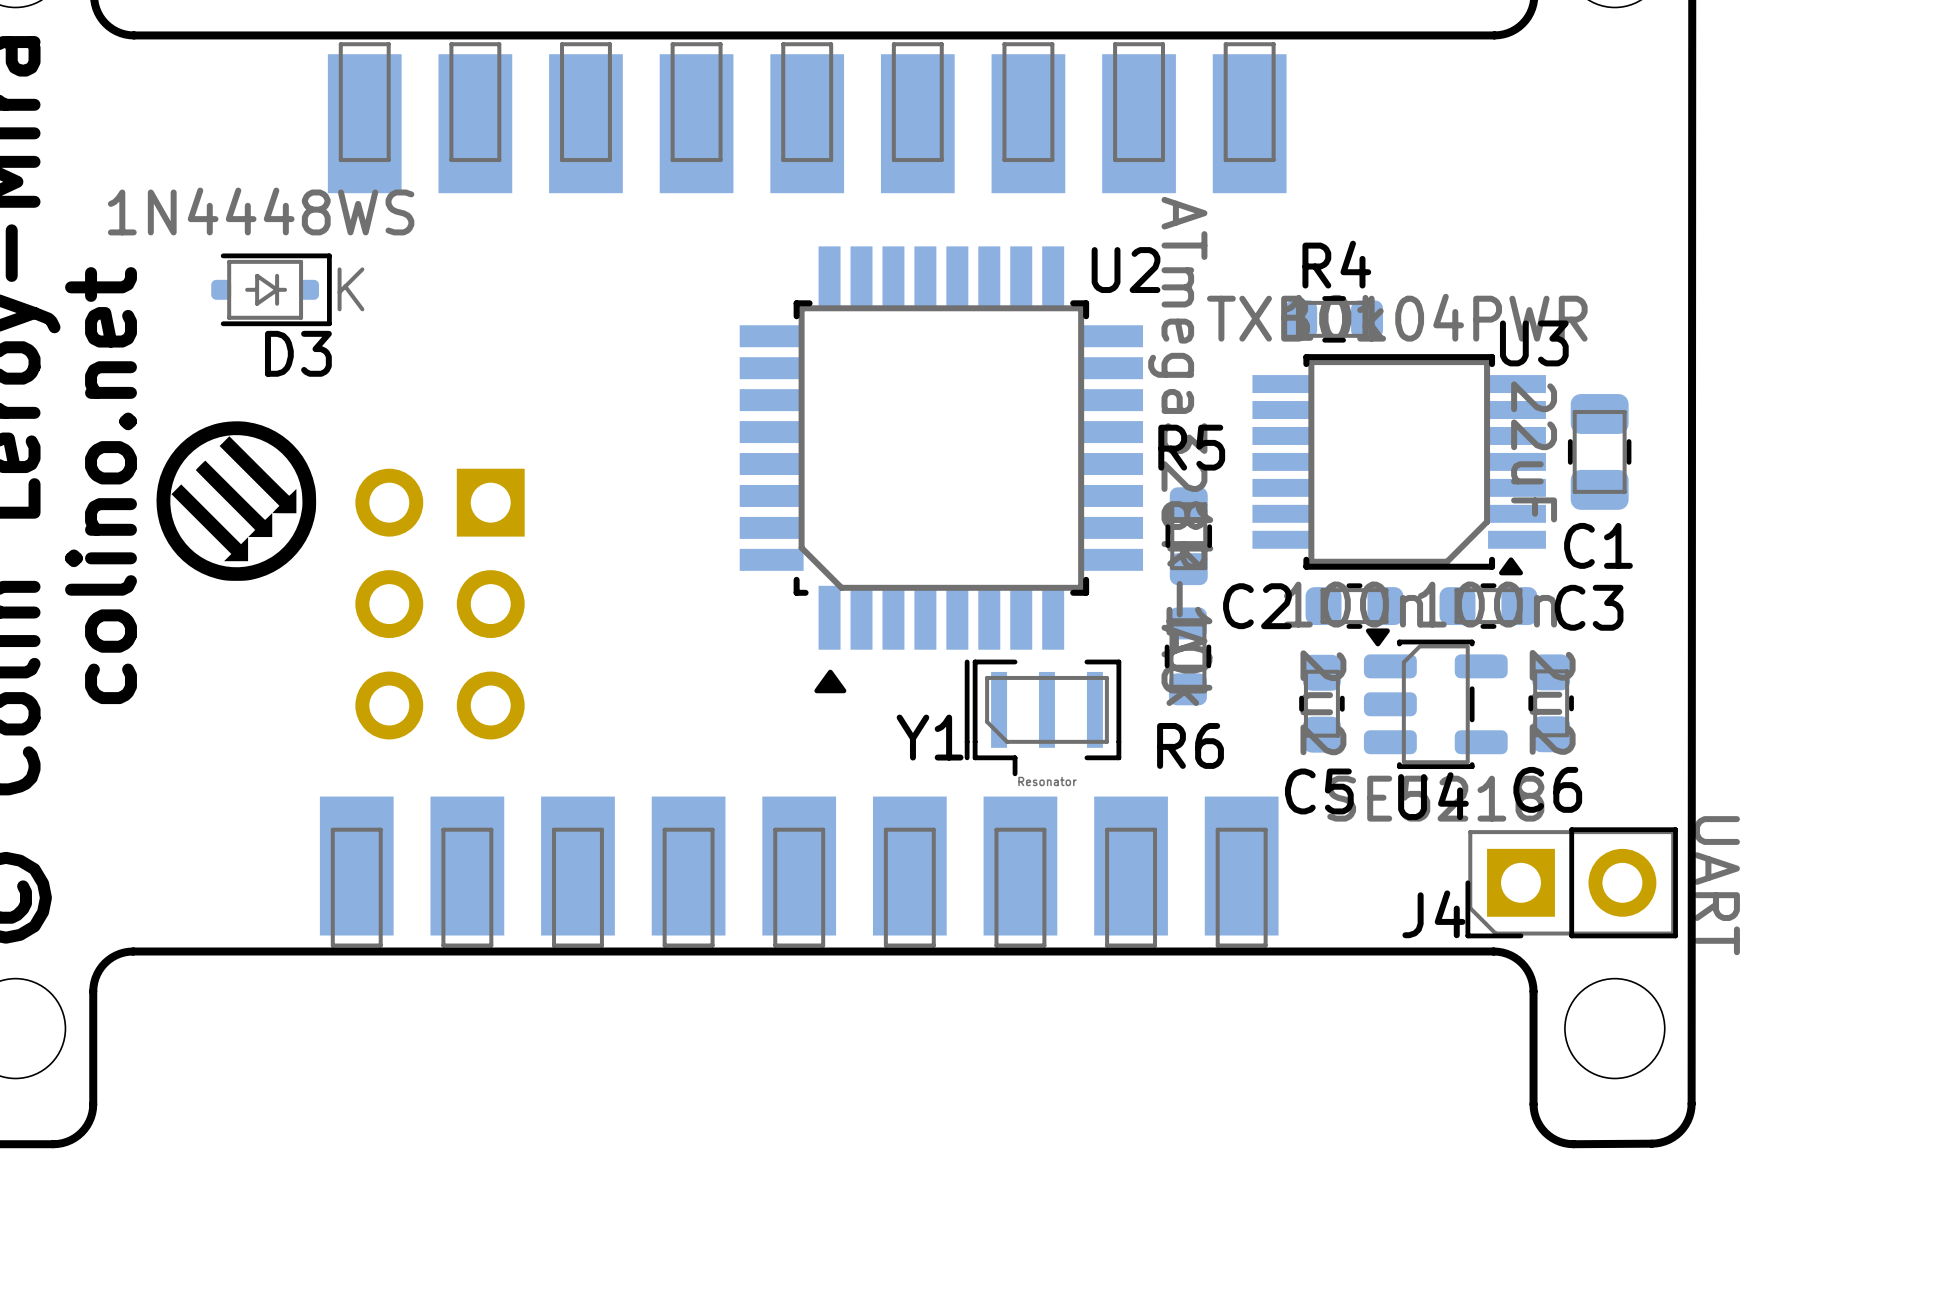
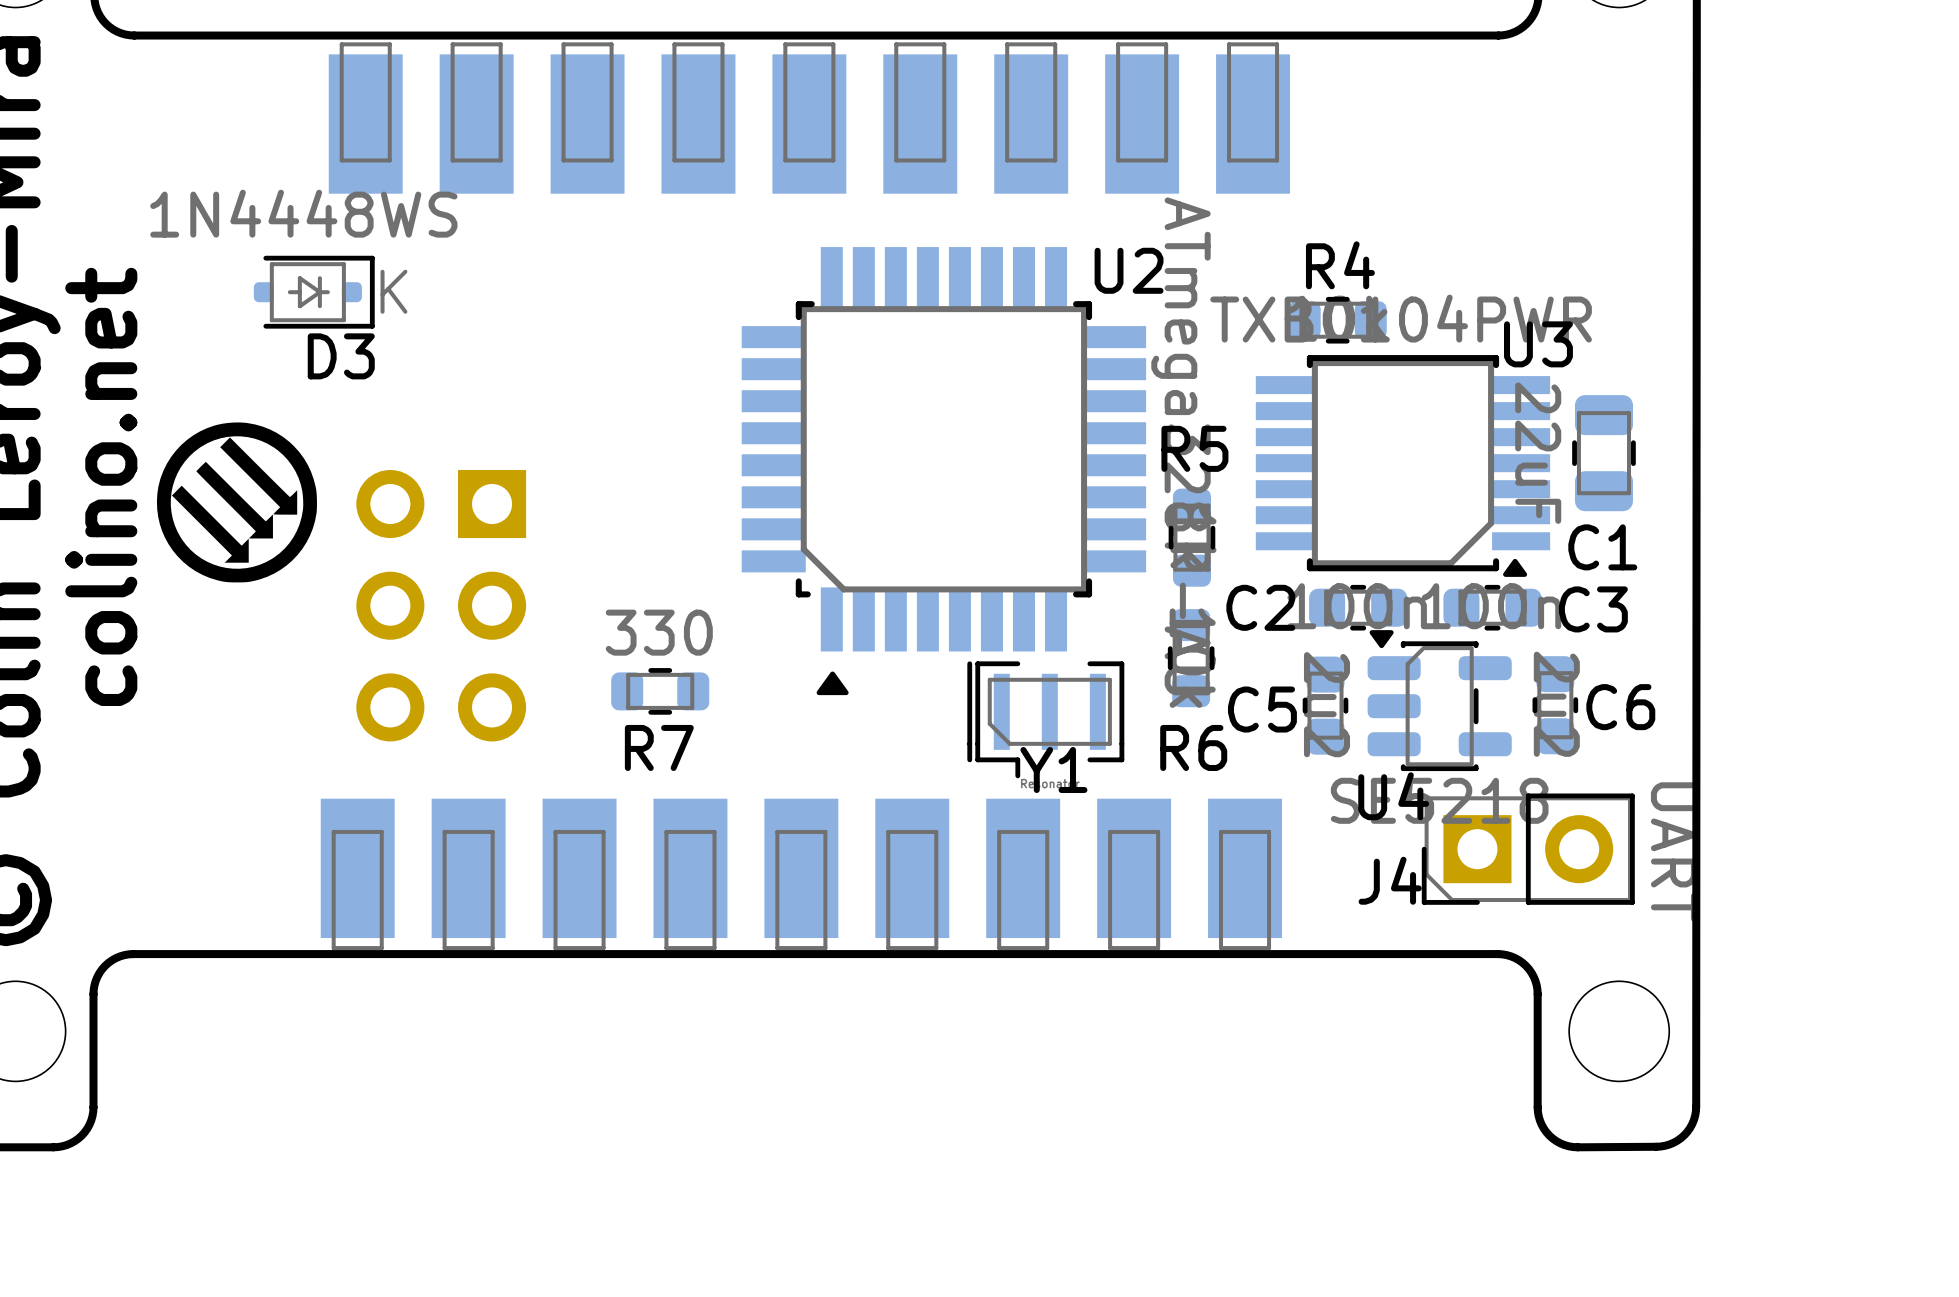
D3 position: (271, 289) -> (314, 292)
R7: none -> 330 (660, 691)
Y1 name position: Y1 (930, 737) -> Y1 (1053, 769)
C6 name position: C6 (1547, 789) -> C6 (1620, 707)
C5 name position: C5 (1319, 791) -> C5 (1262, 709)
U4 name position: U4 (1433, 796) -> U4 (1393, 796)
J4 position: (1571, 882) -> (1528, 849)

